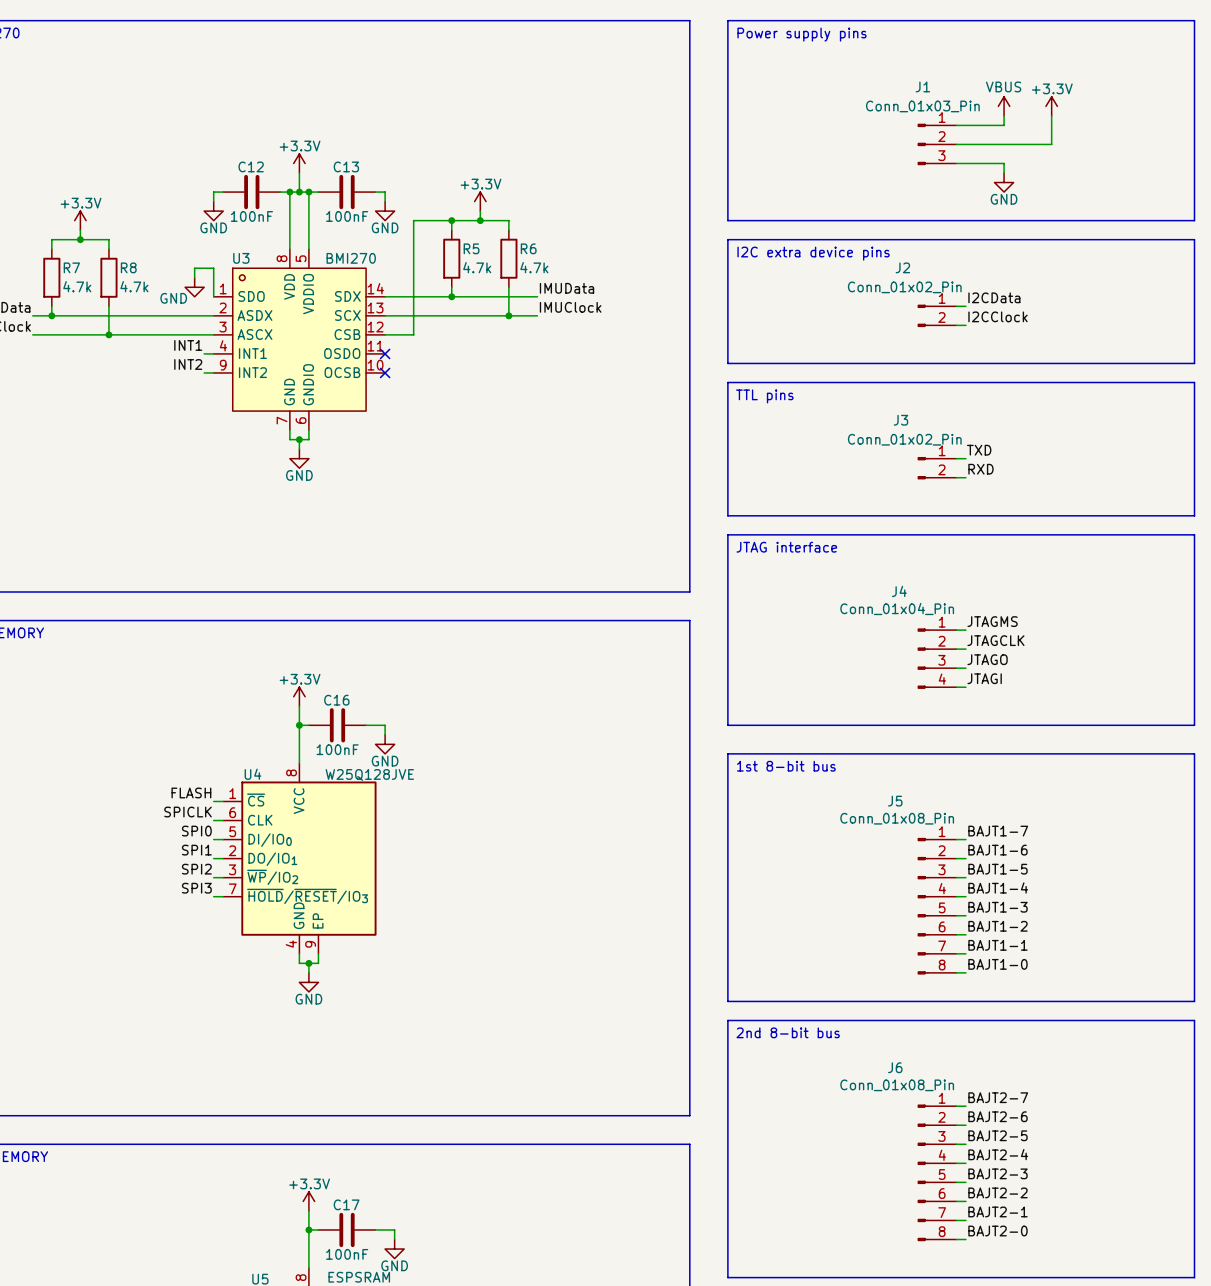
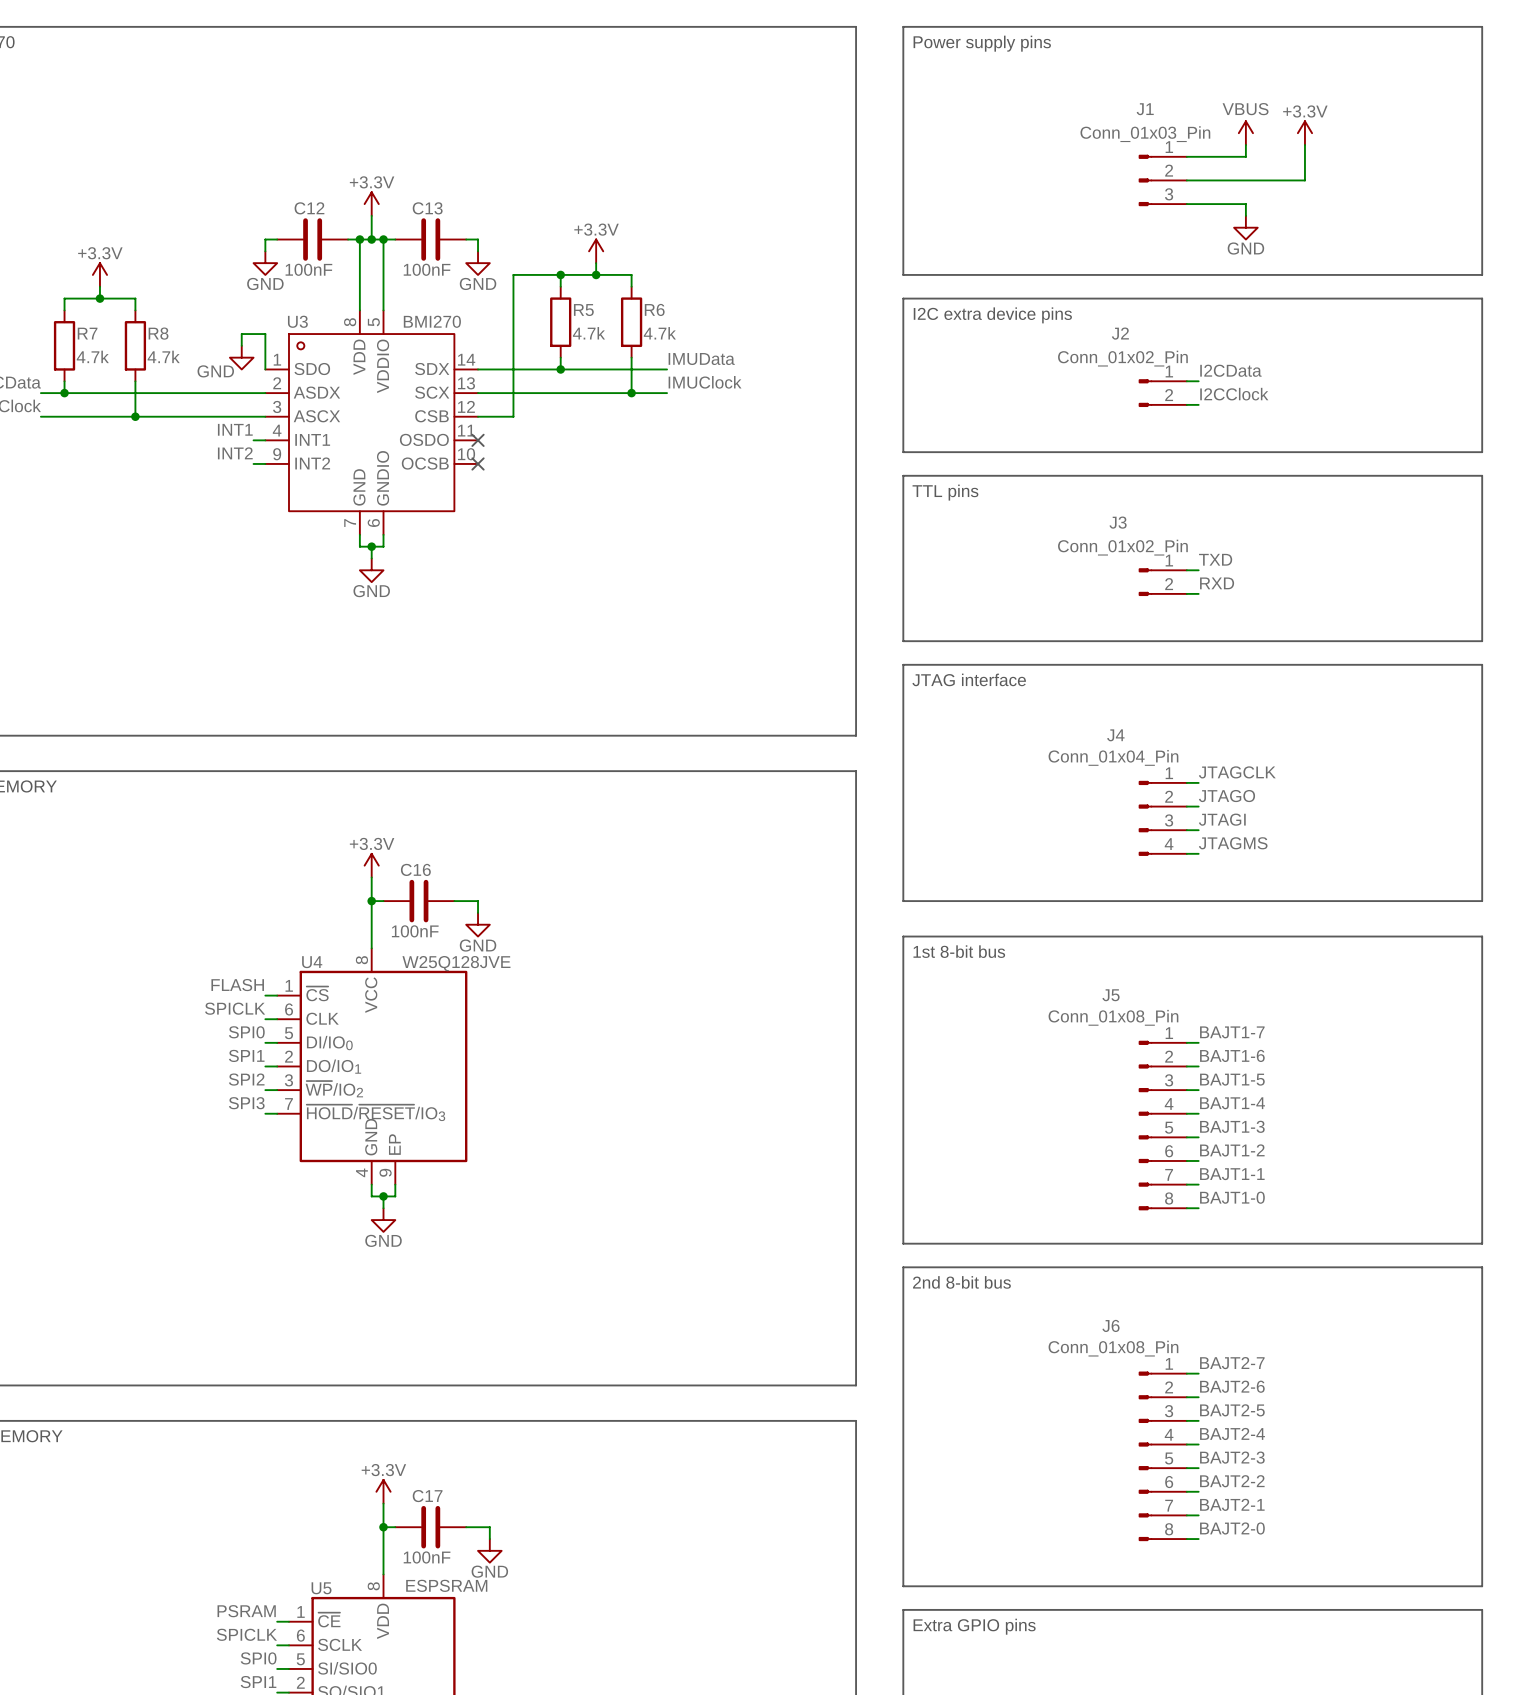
label: JTAGMS (992, 621) -> JTAGCLK (1237, 772)
label: JTAGCLK (995, 640) -> JTAGO (1227, 796)
label: JTAGO (987, 659) -> JTAGI (1222, 819)
label: JTAGI (984, 678) -> JTAGMS (1233, 843)

